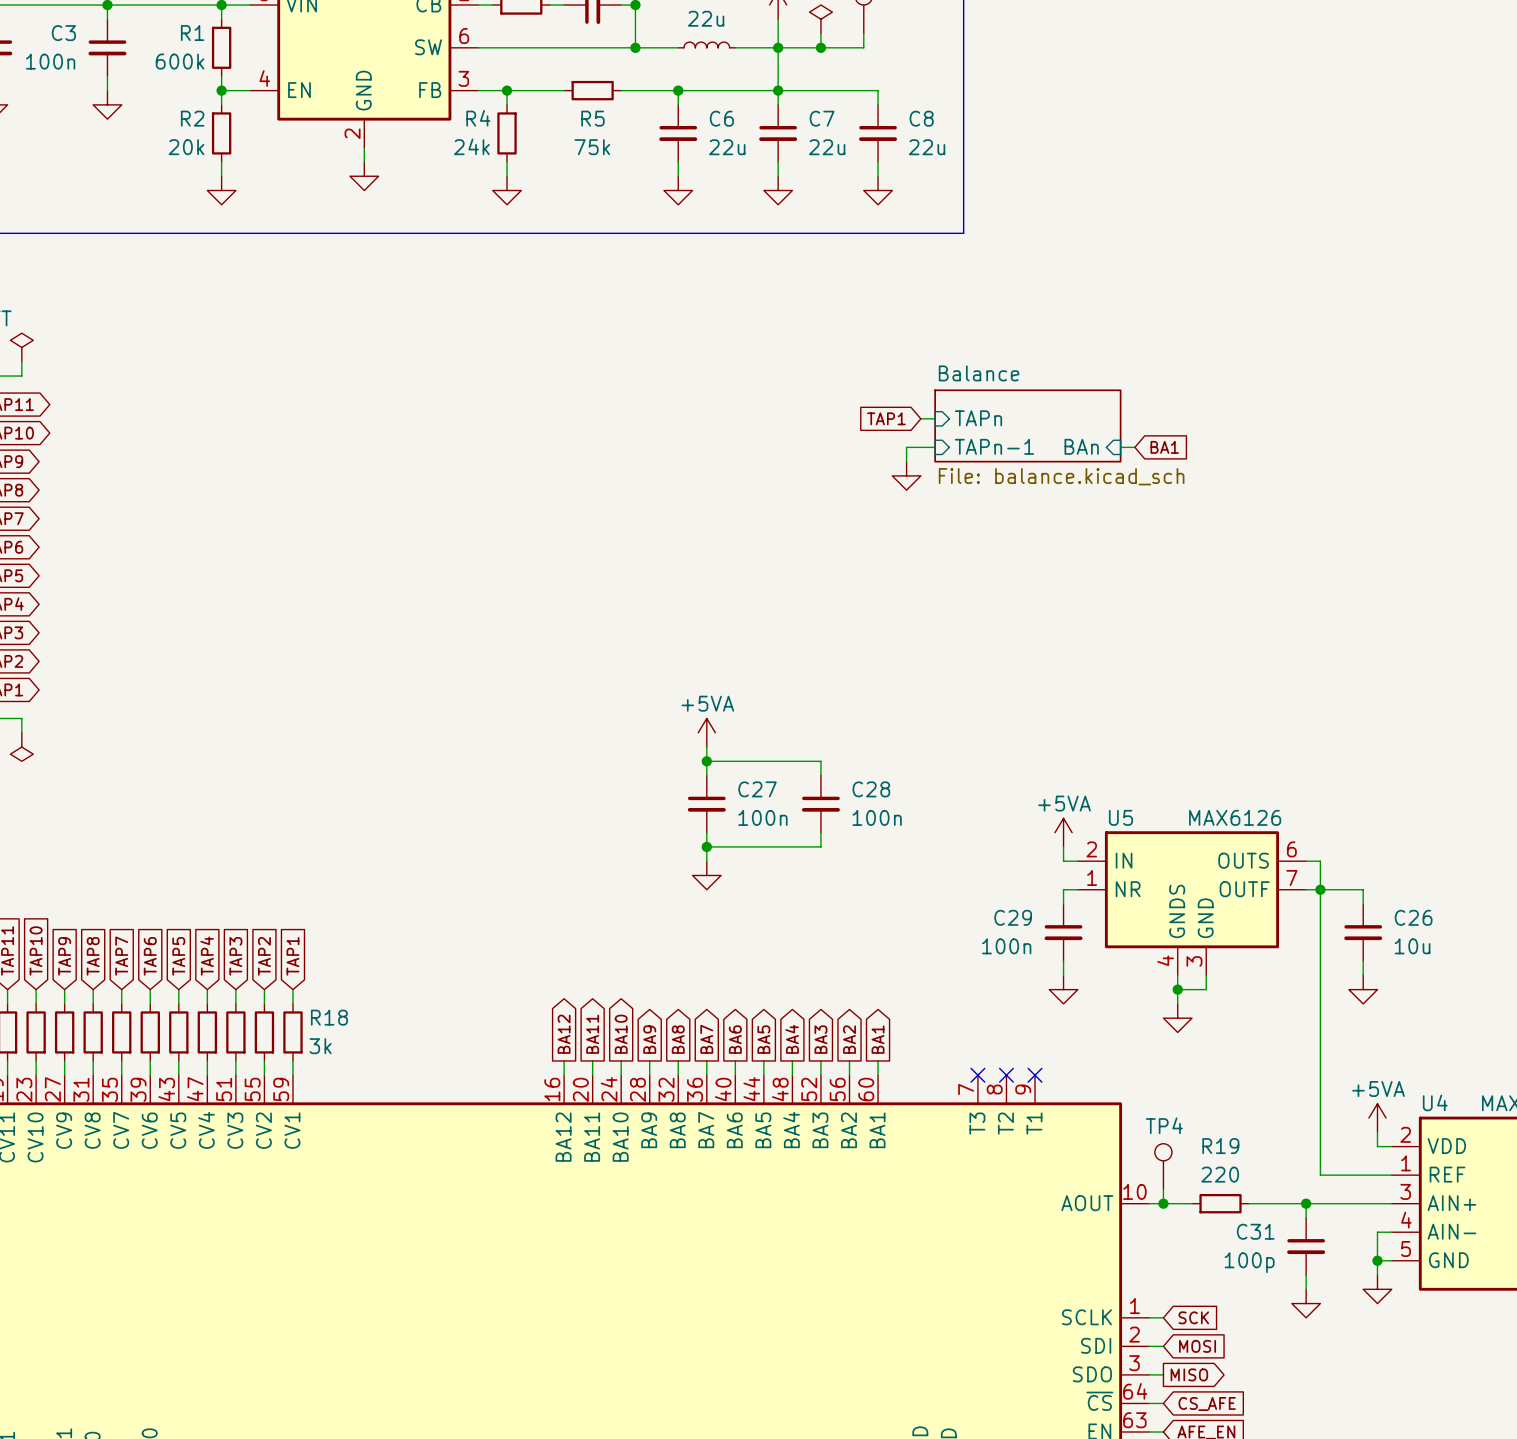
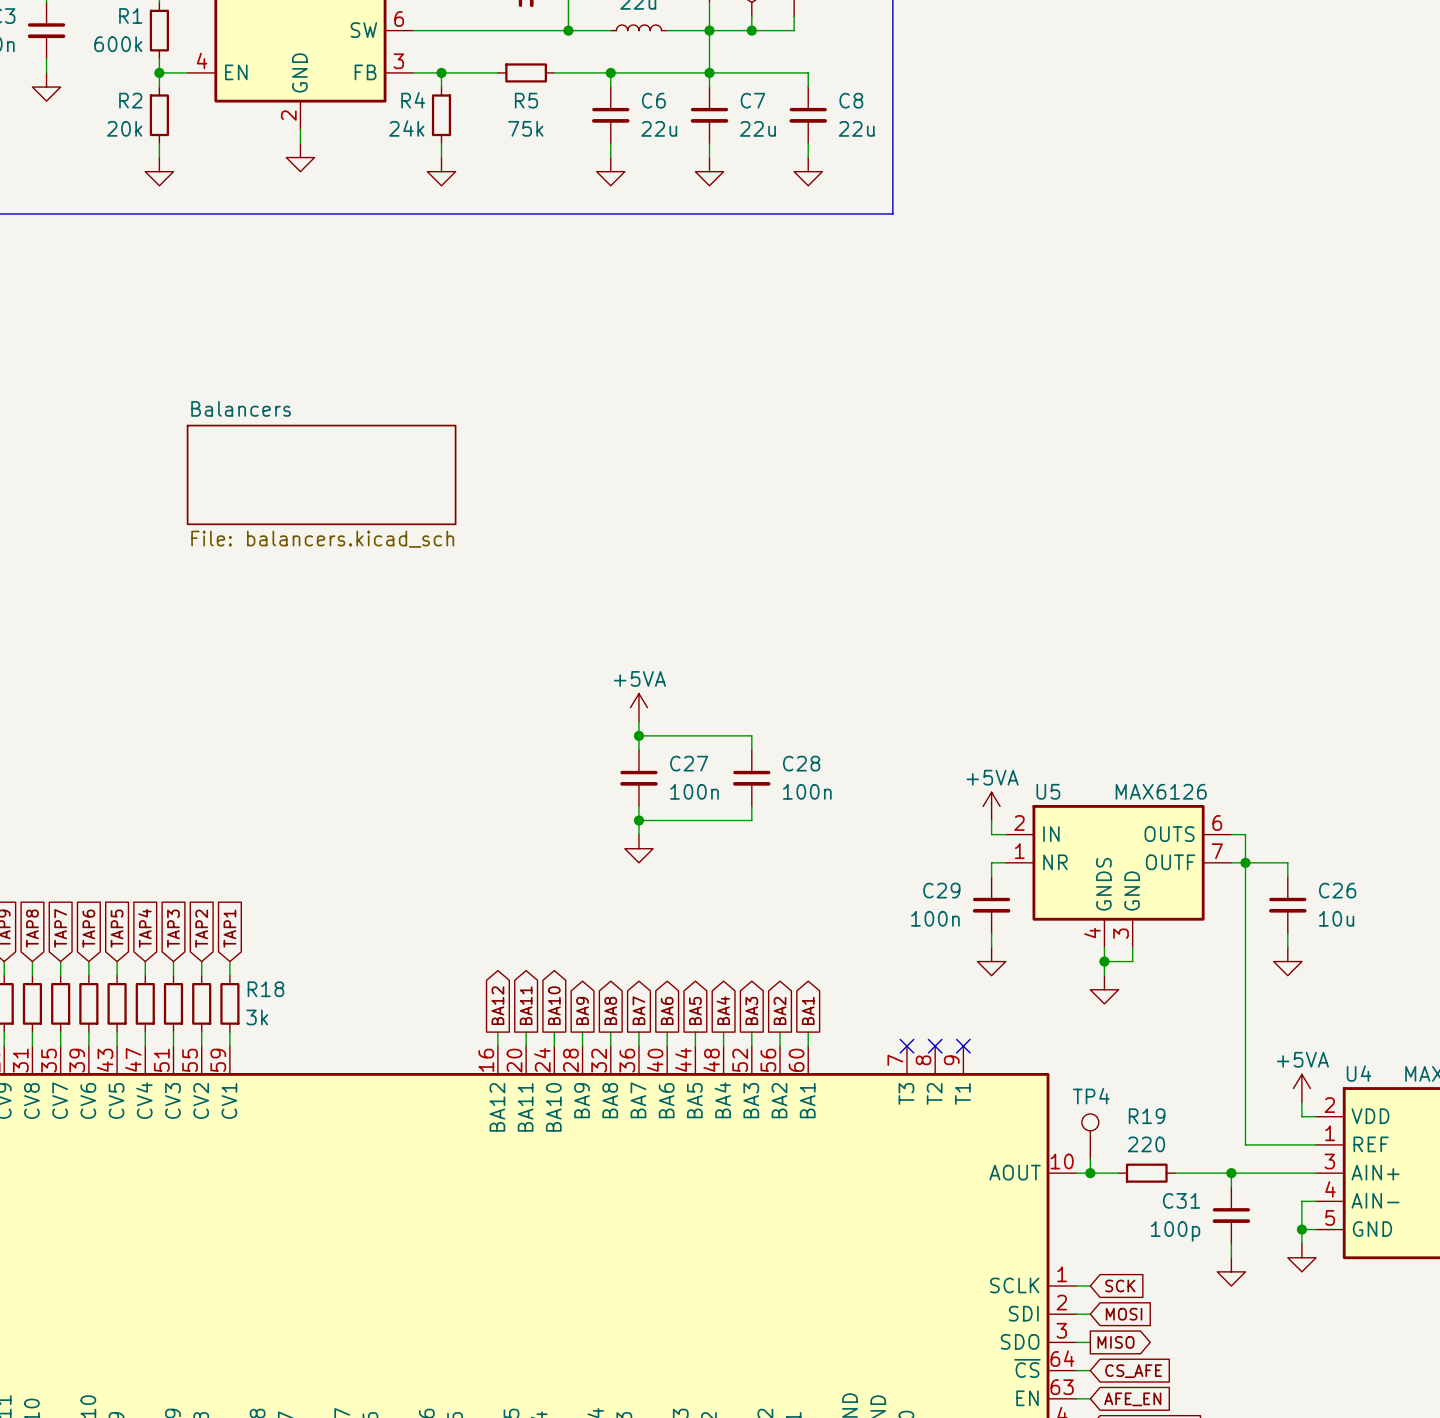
global label: TAP1 (886, 418) -> none
wire: (920, 418) (935, 418) -> none
sheet pin: TAPn (978, 418) -> none
sheet Balance: File: balance.kicad_sch (1027, 425) -> none
sheet pin: TAPn-1 (994, 446) -> none
sheet pin: BAn (1081, 446) -> none
wire: (935, 447) (906, 447) (906, 461) -> none
wire: (1120, 447) (1134, 447) -> none
global label: BA1 (1164, 447) -> none
power symbol: (906, 475) -> none
sheet Balancers: none -> File: balancers.kicad_sch (321, 474)

